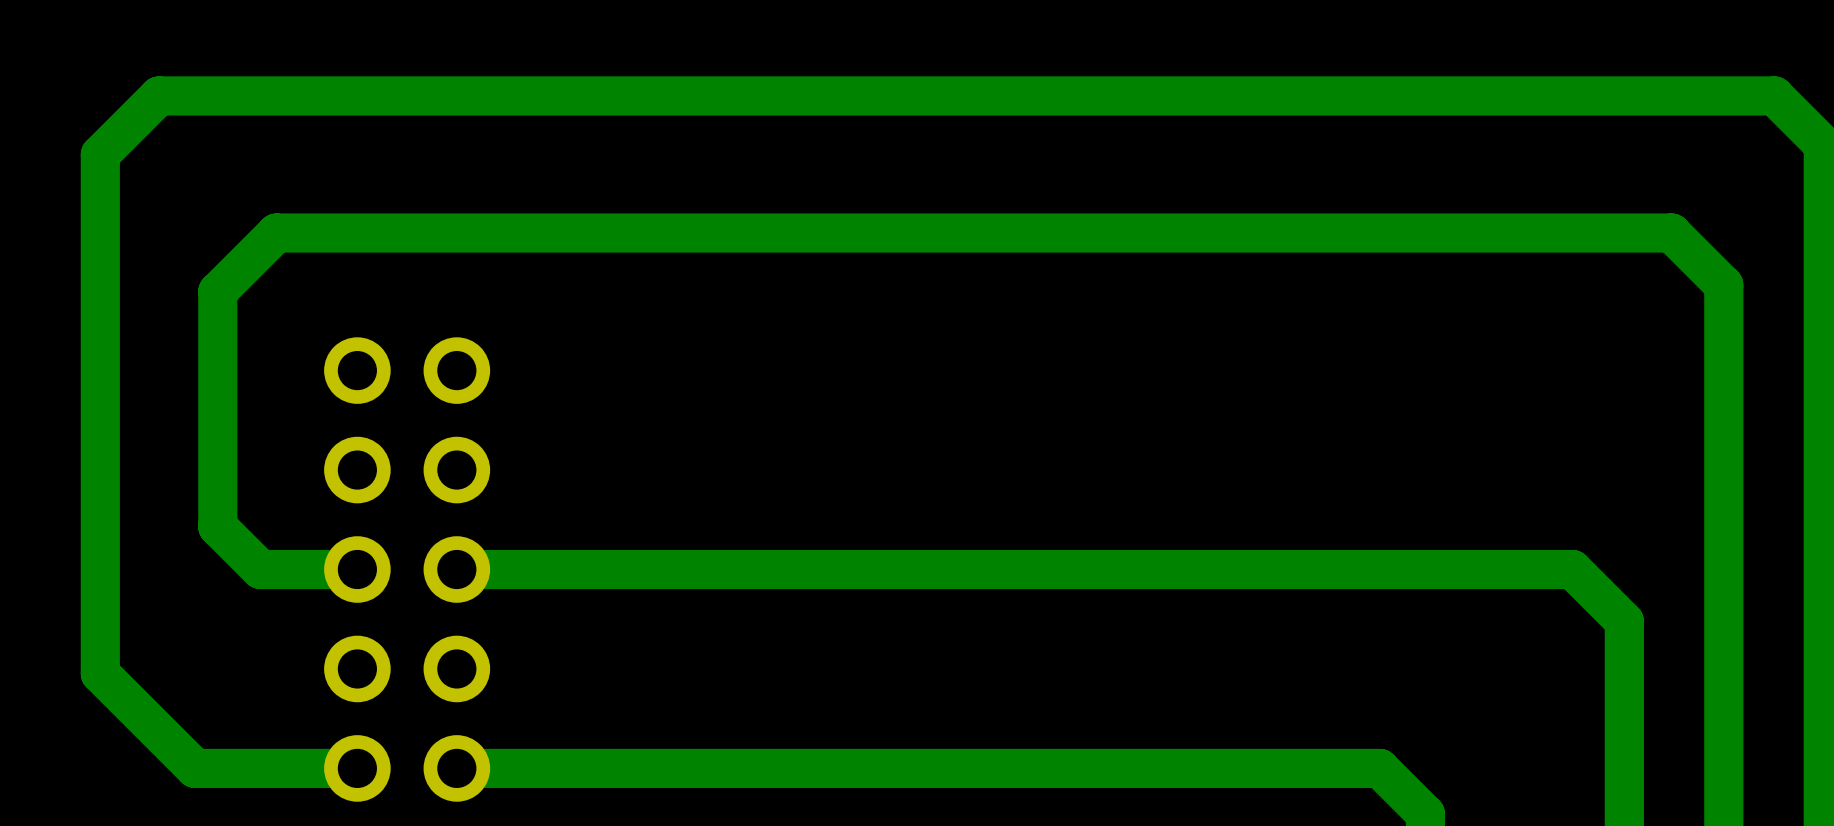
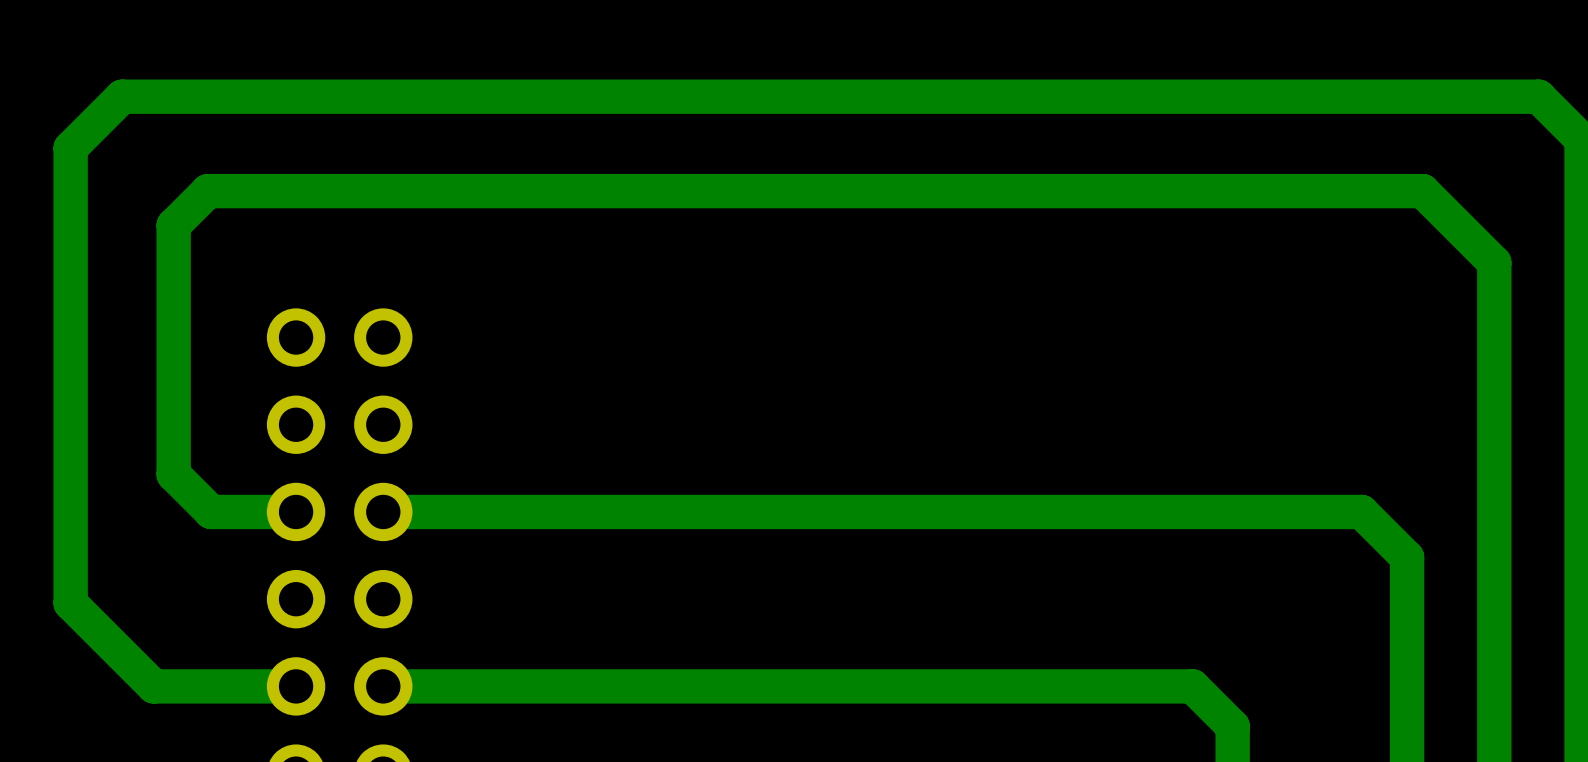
bottom track: (1671, 232) (276, 232) (217, 291) -> (1448, 216) (1422, 191) (207, 191) (173, 225) (173, 268)

